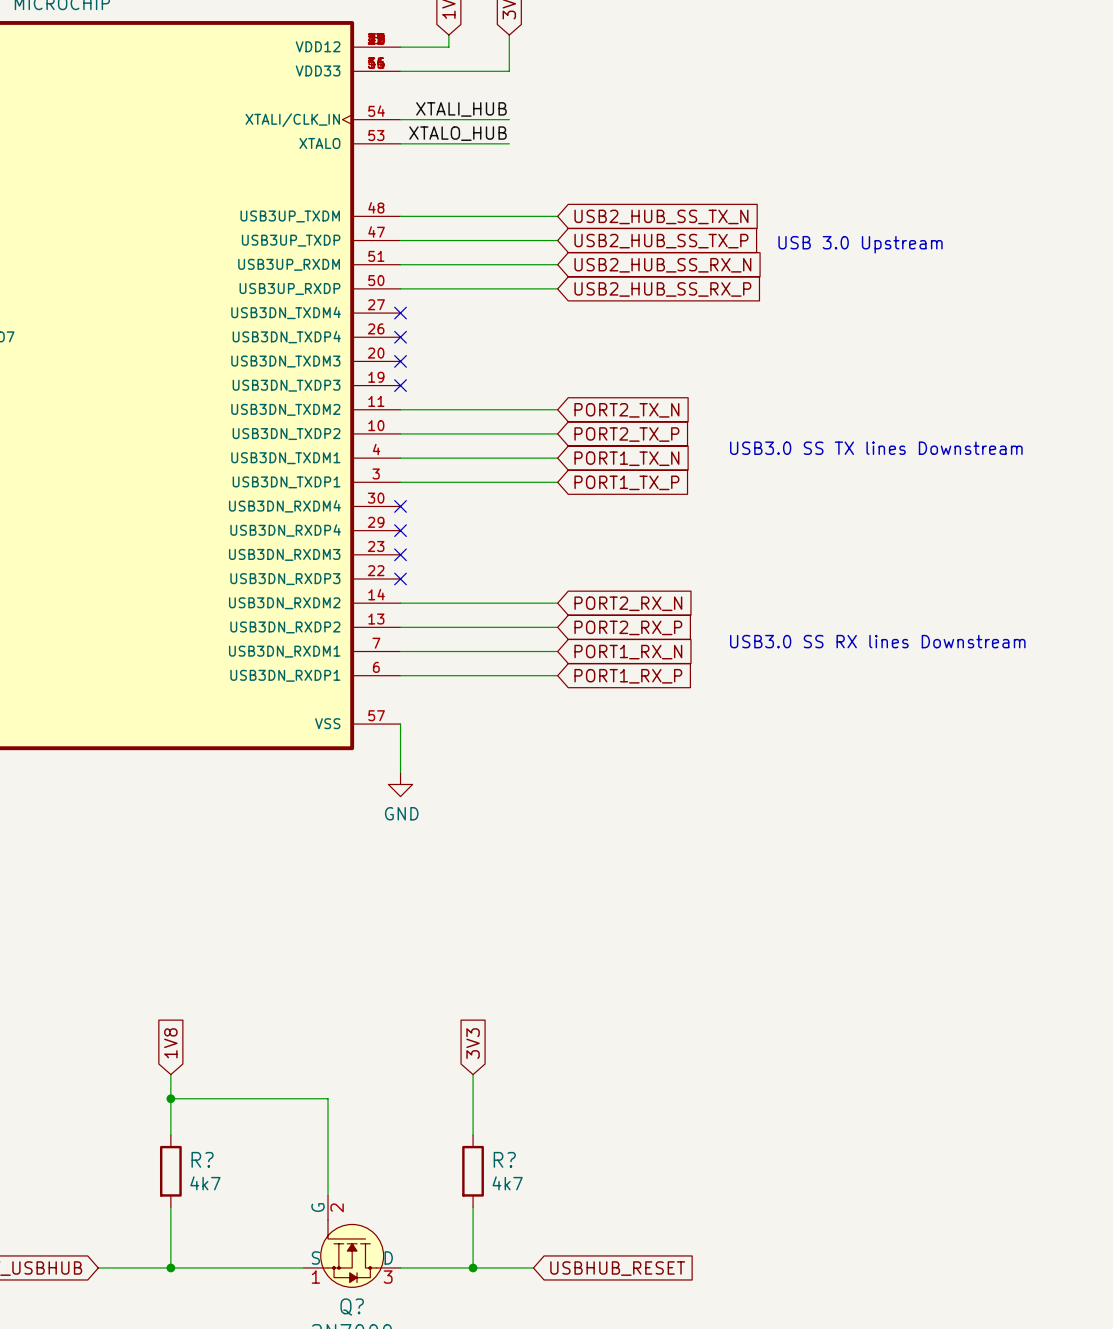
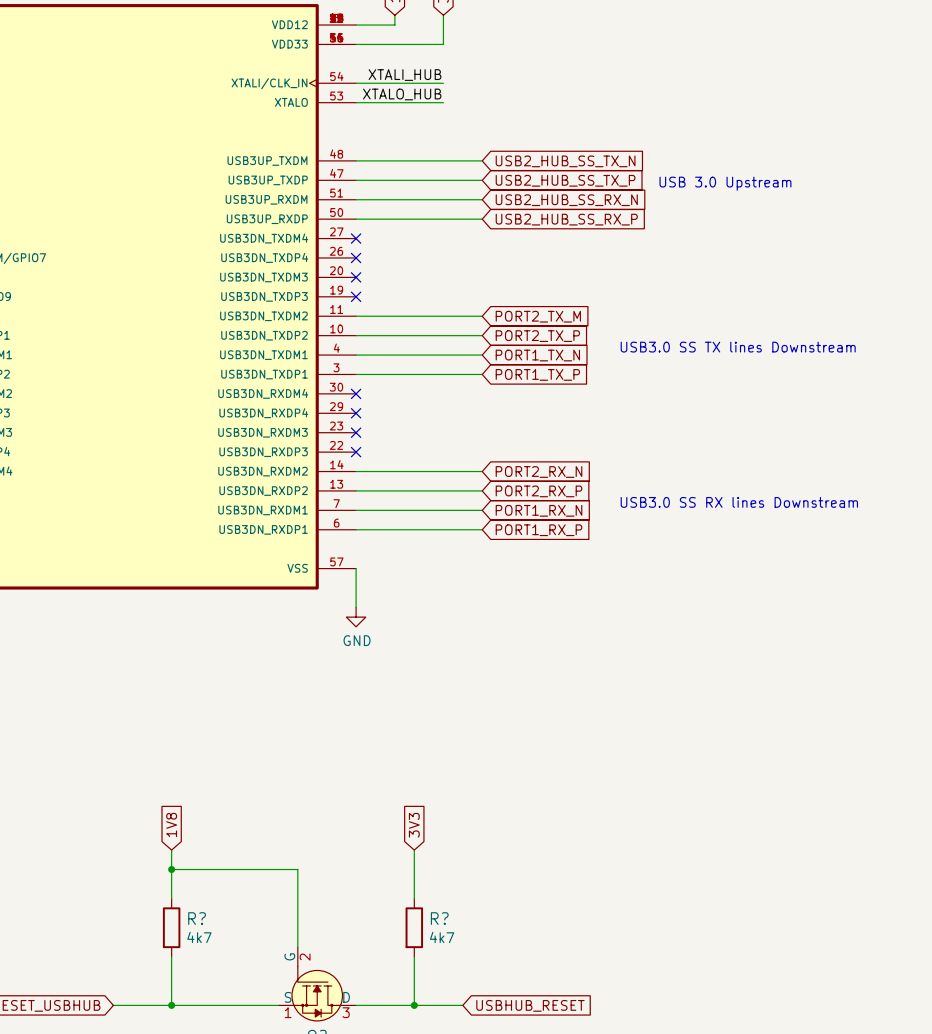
global label: PORT2_TX_N (626, 410) -> PORT2_TX_M (538, 316)

